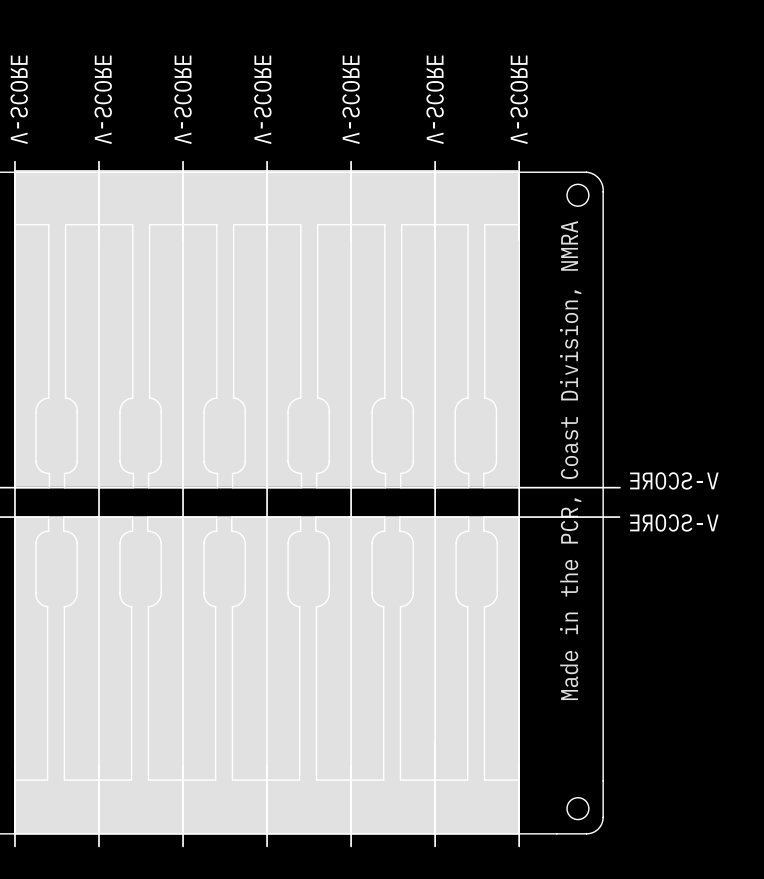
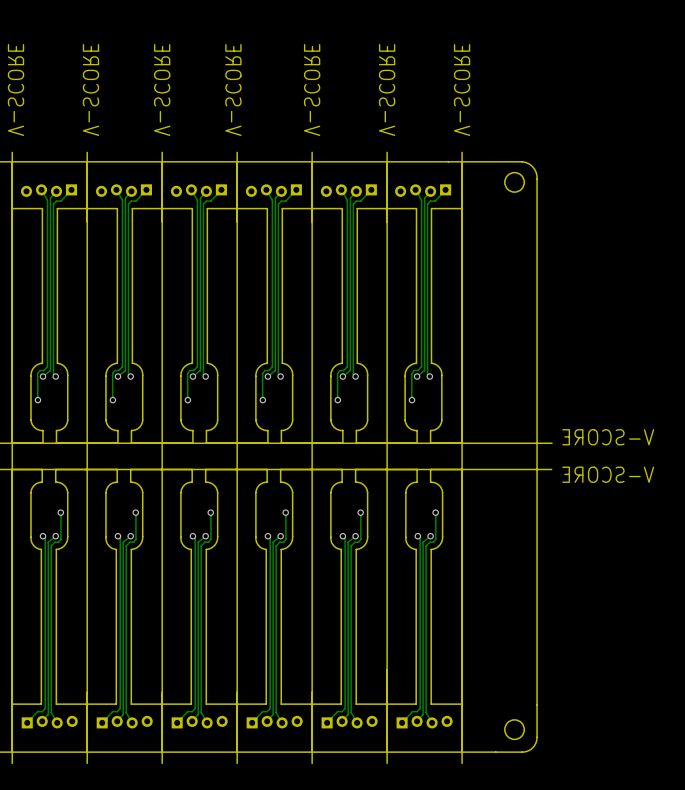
drawing: [14, 170, 519, 487] -> none
track: none -> (415, 189) (421, 200)
text: Made in the PCR, Coast Division, NMRA (570, 460) -> none
drawing: [14, 517, 520, 835] -> none

